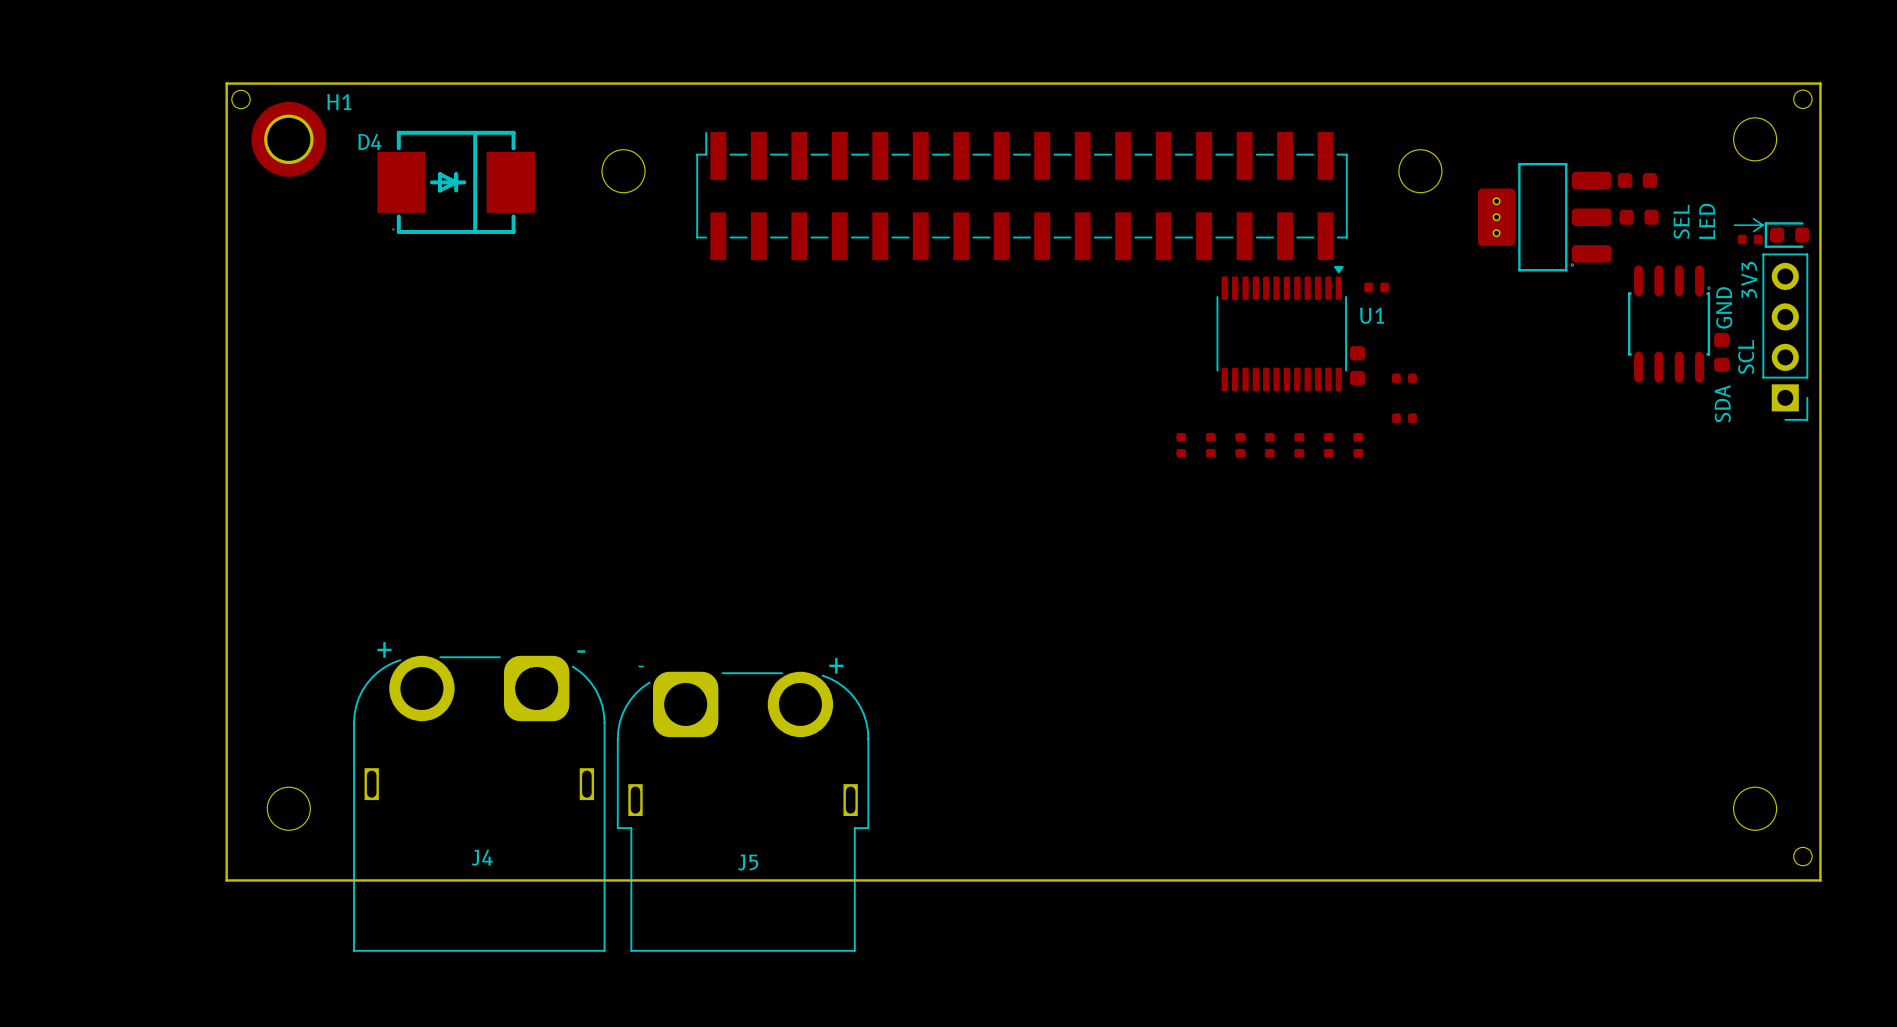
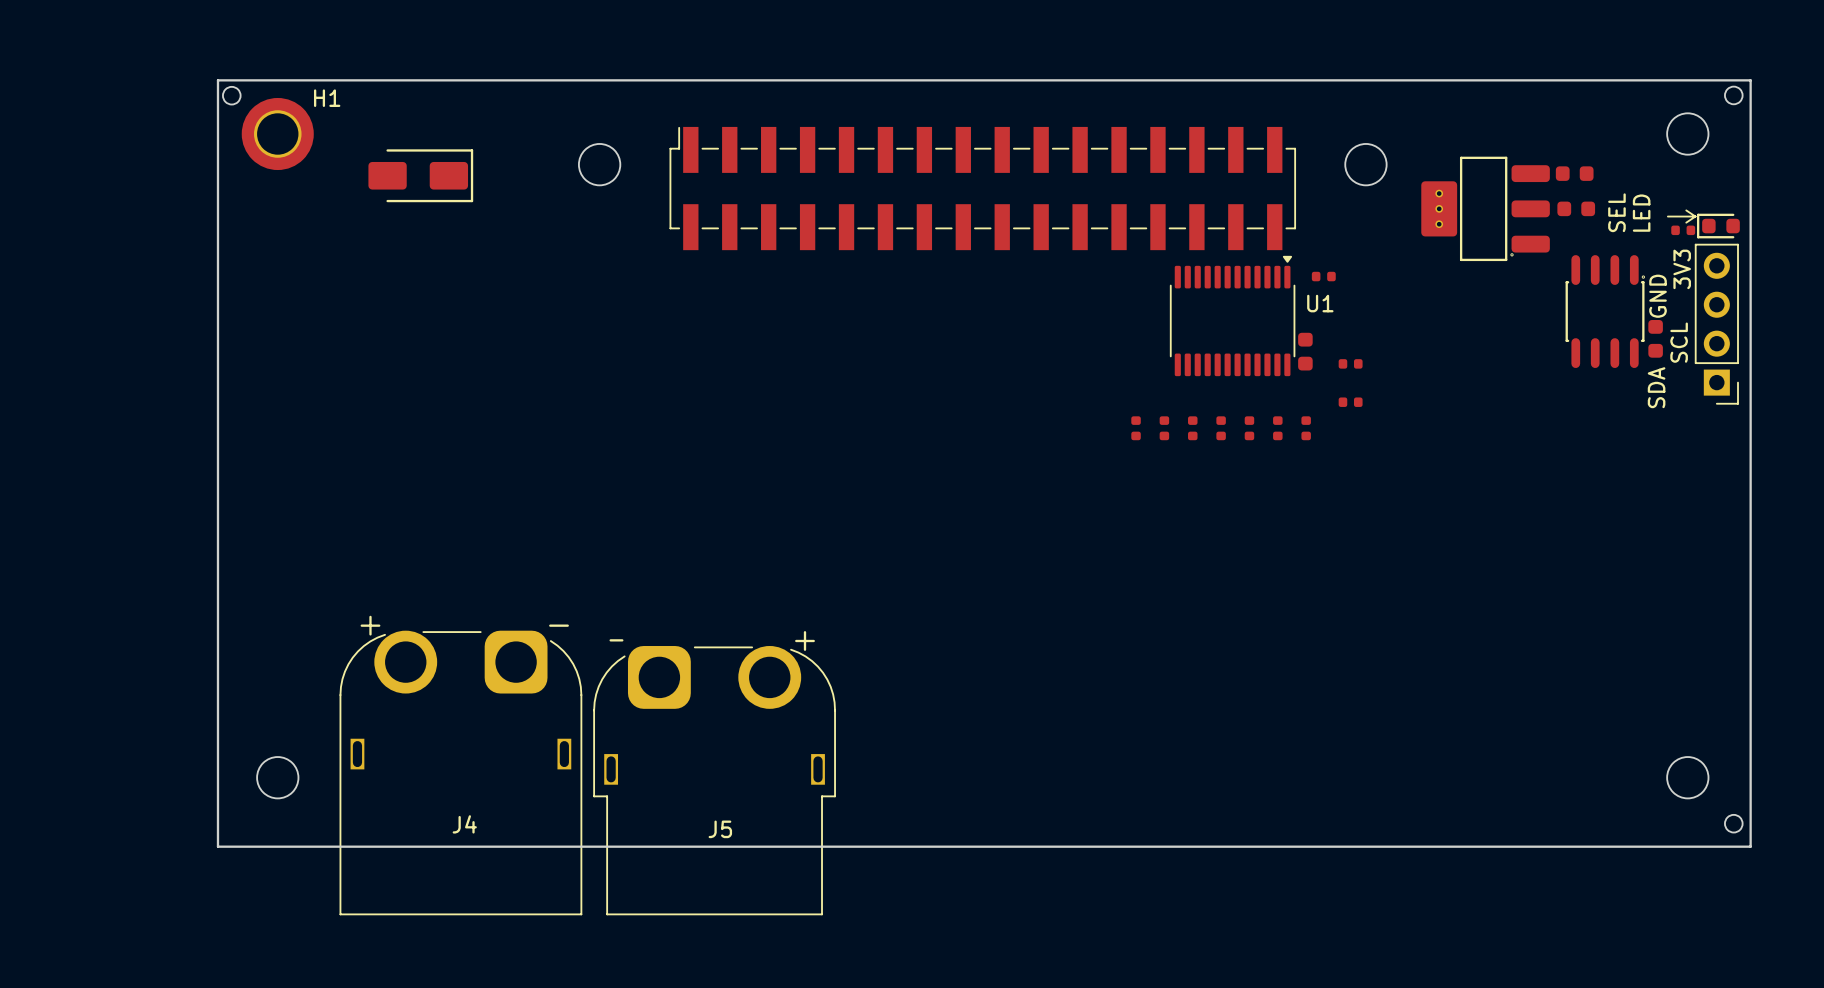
part: none -> (420, 175)
D4: (456, 182) -> none

